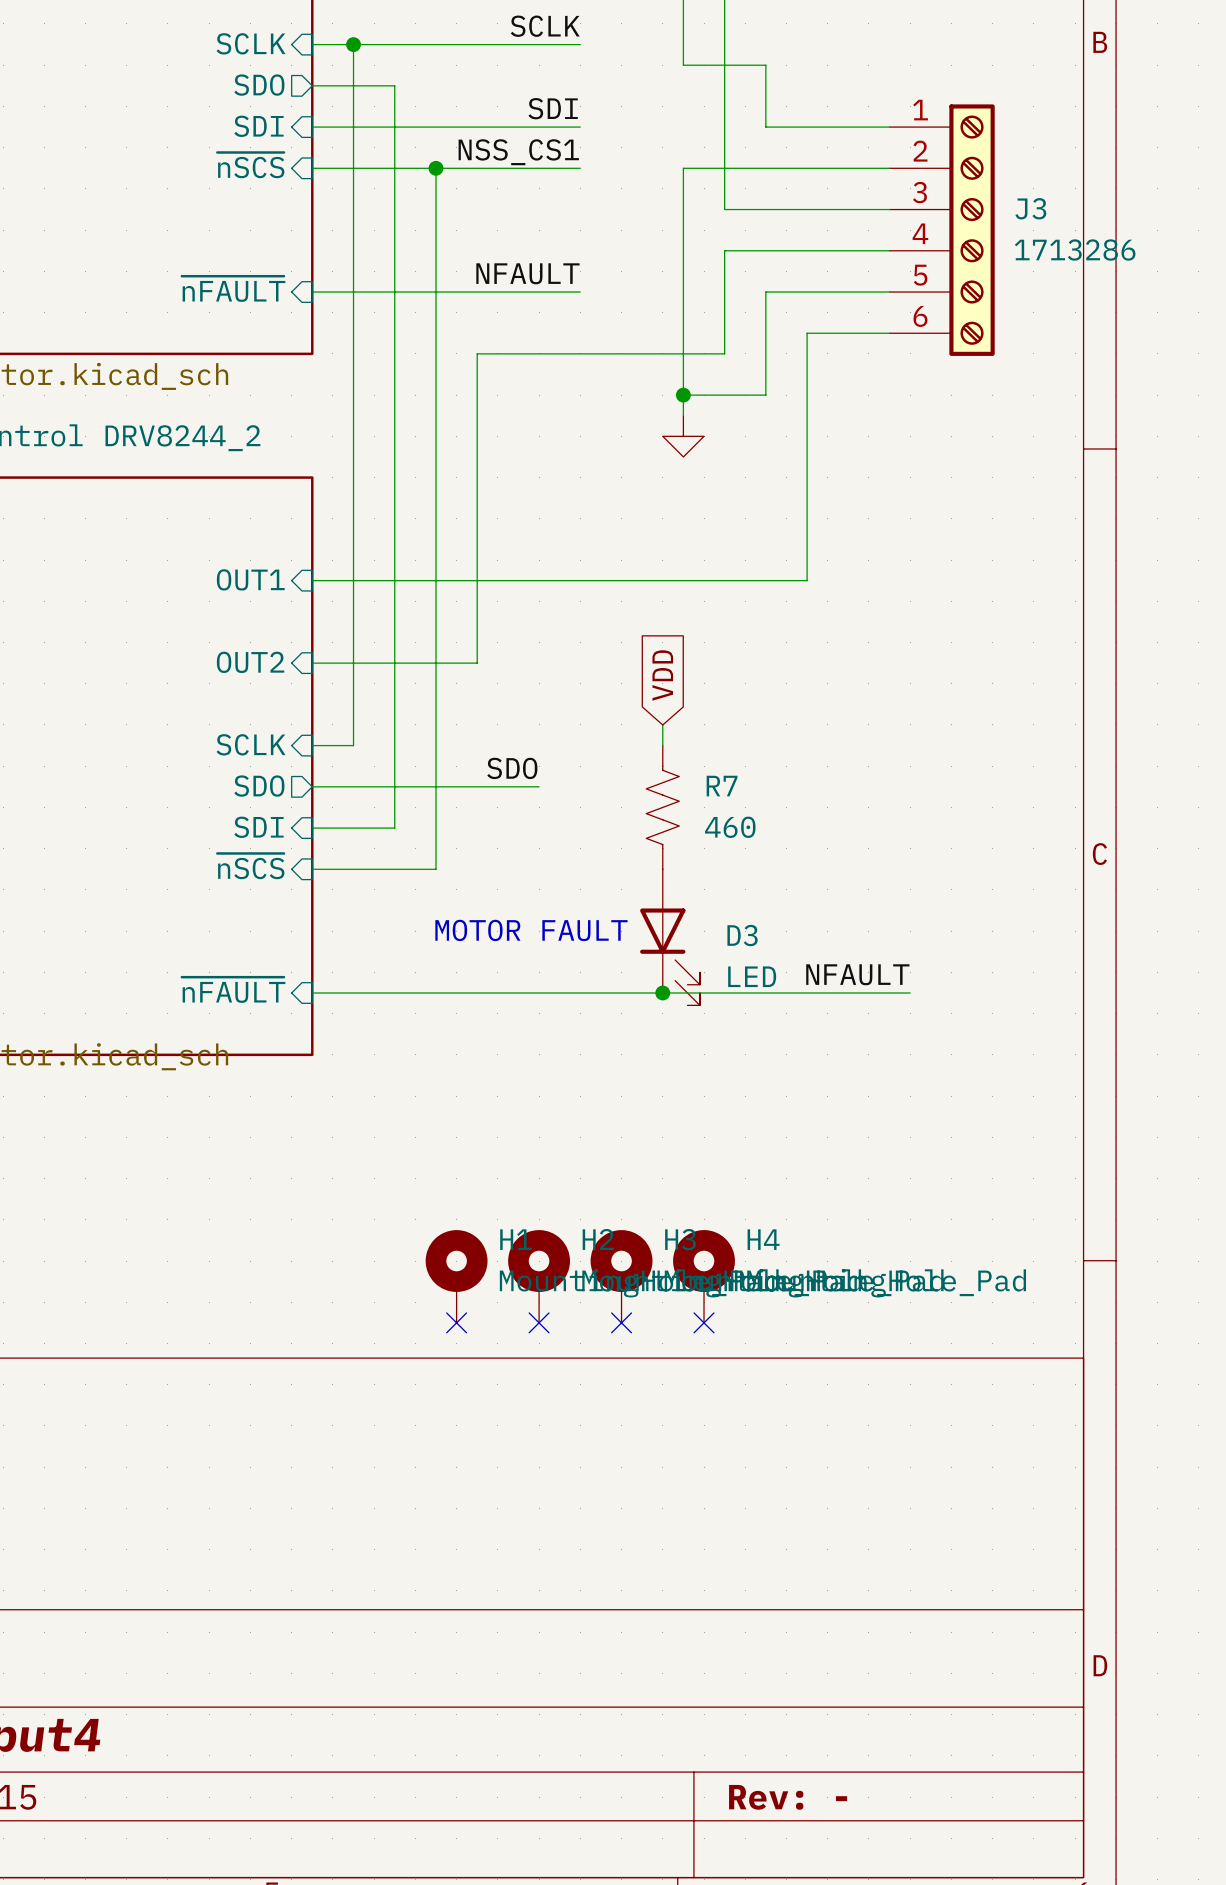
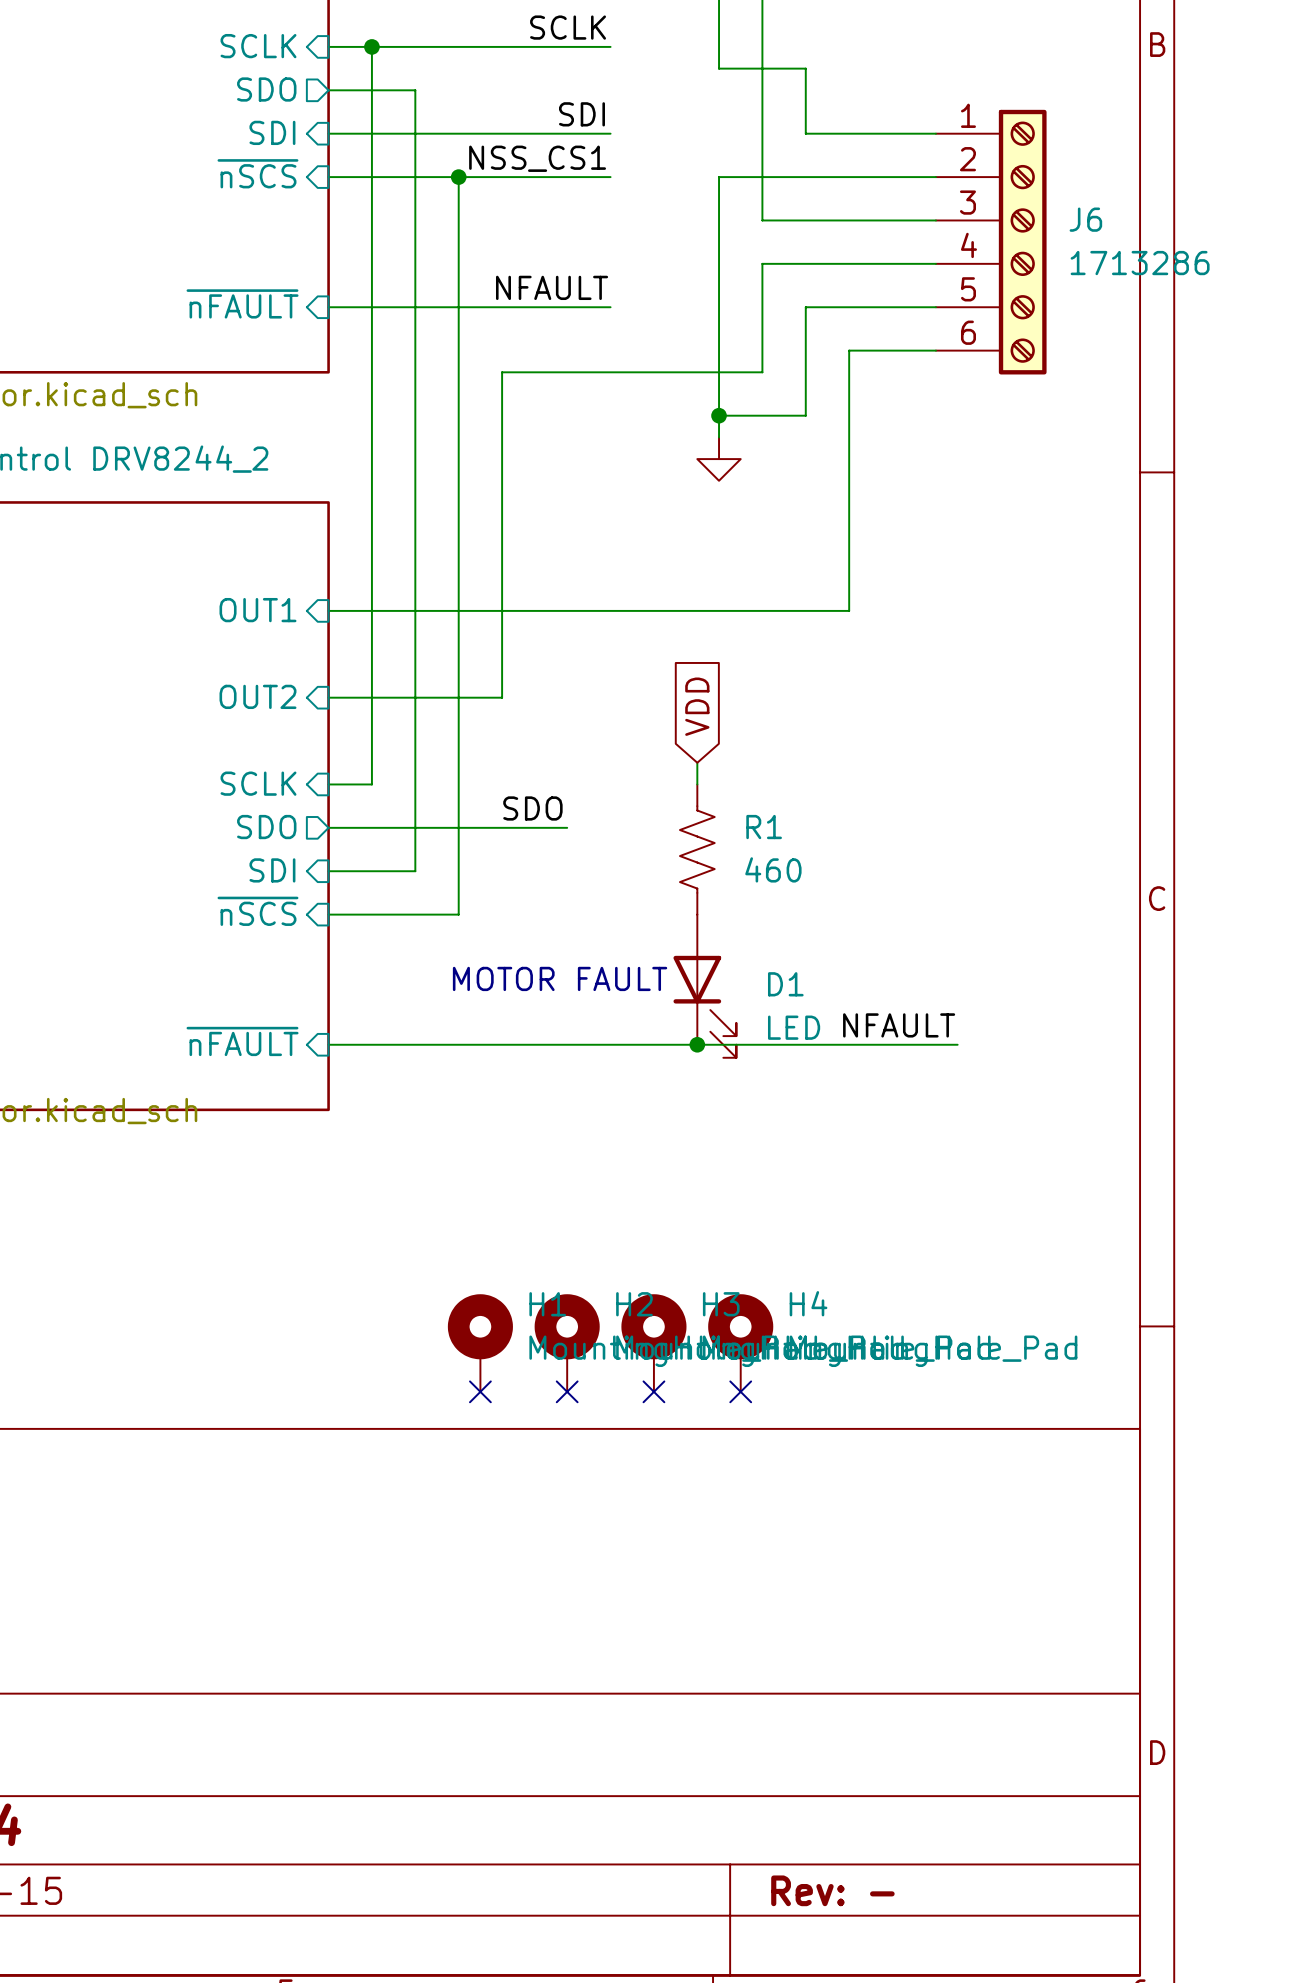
J3 name: J3 (1030, 208) -> J6 (1085, 219)
R7 name: R7 (722, 786) -> R1 (764, 827)
D3 name: D3 (742, 935) -> D1 (785, 984)

